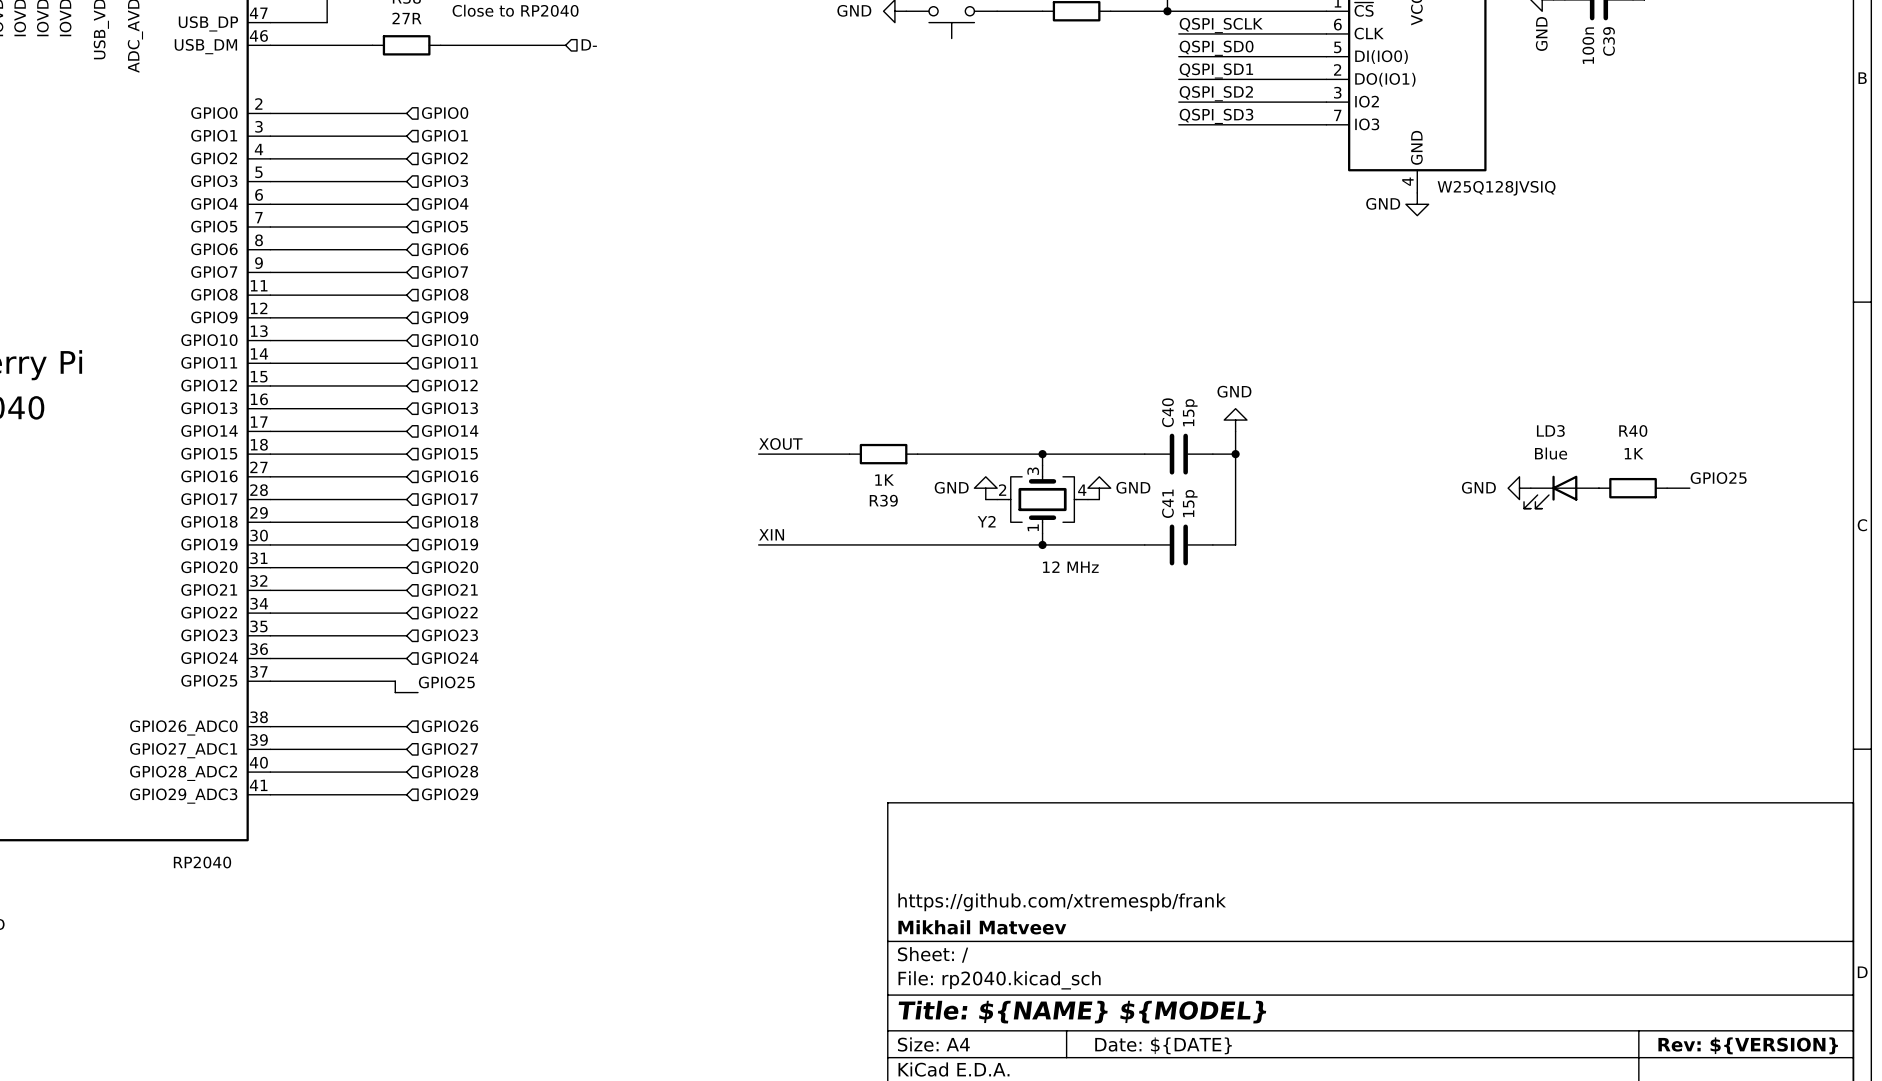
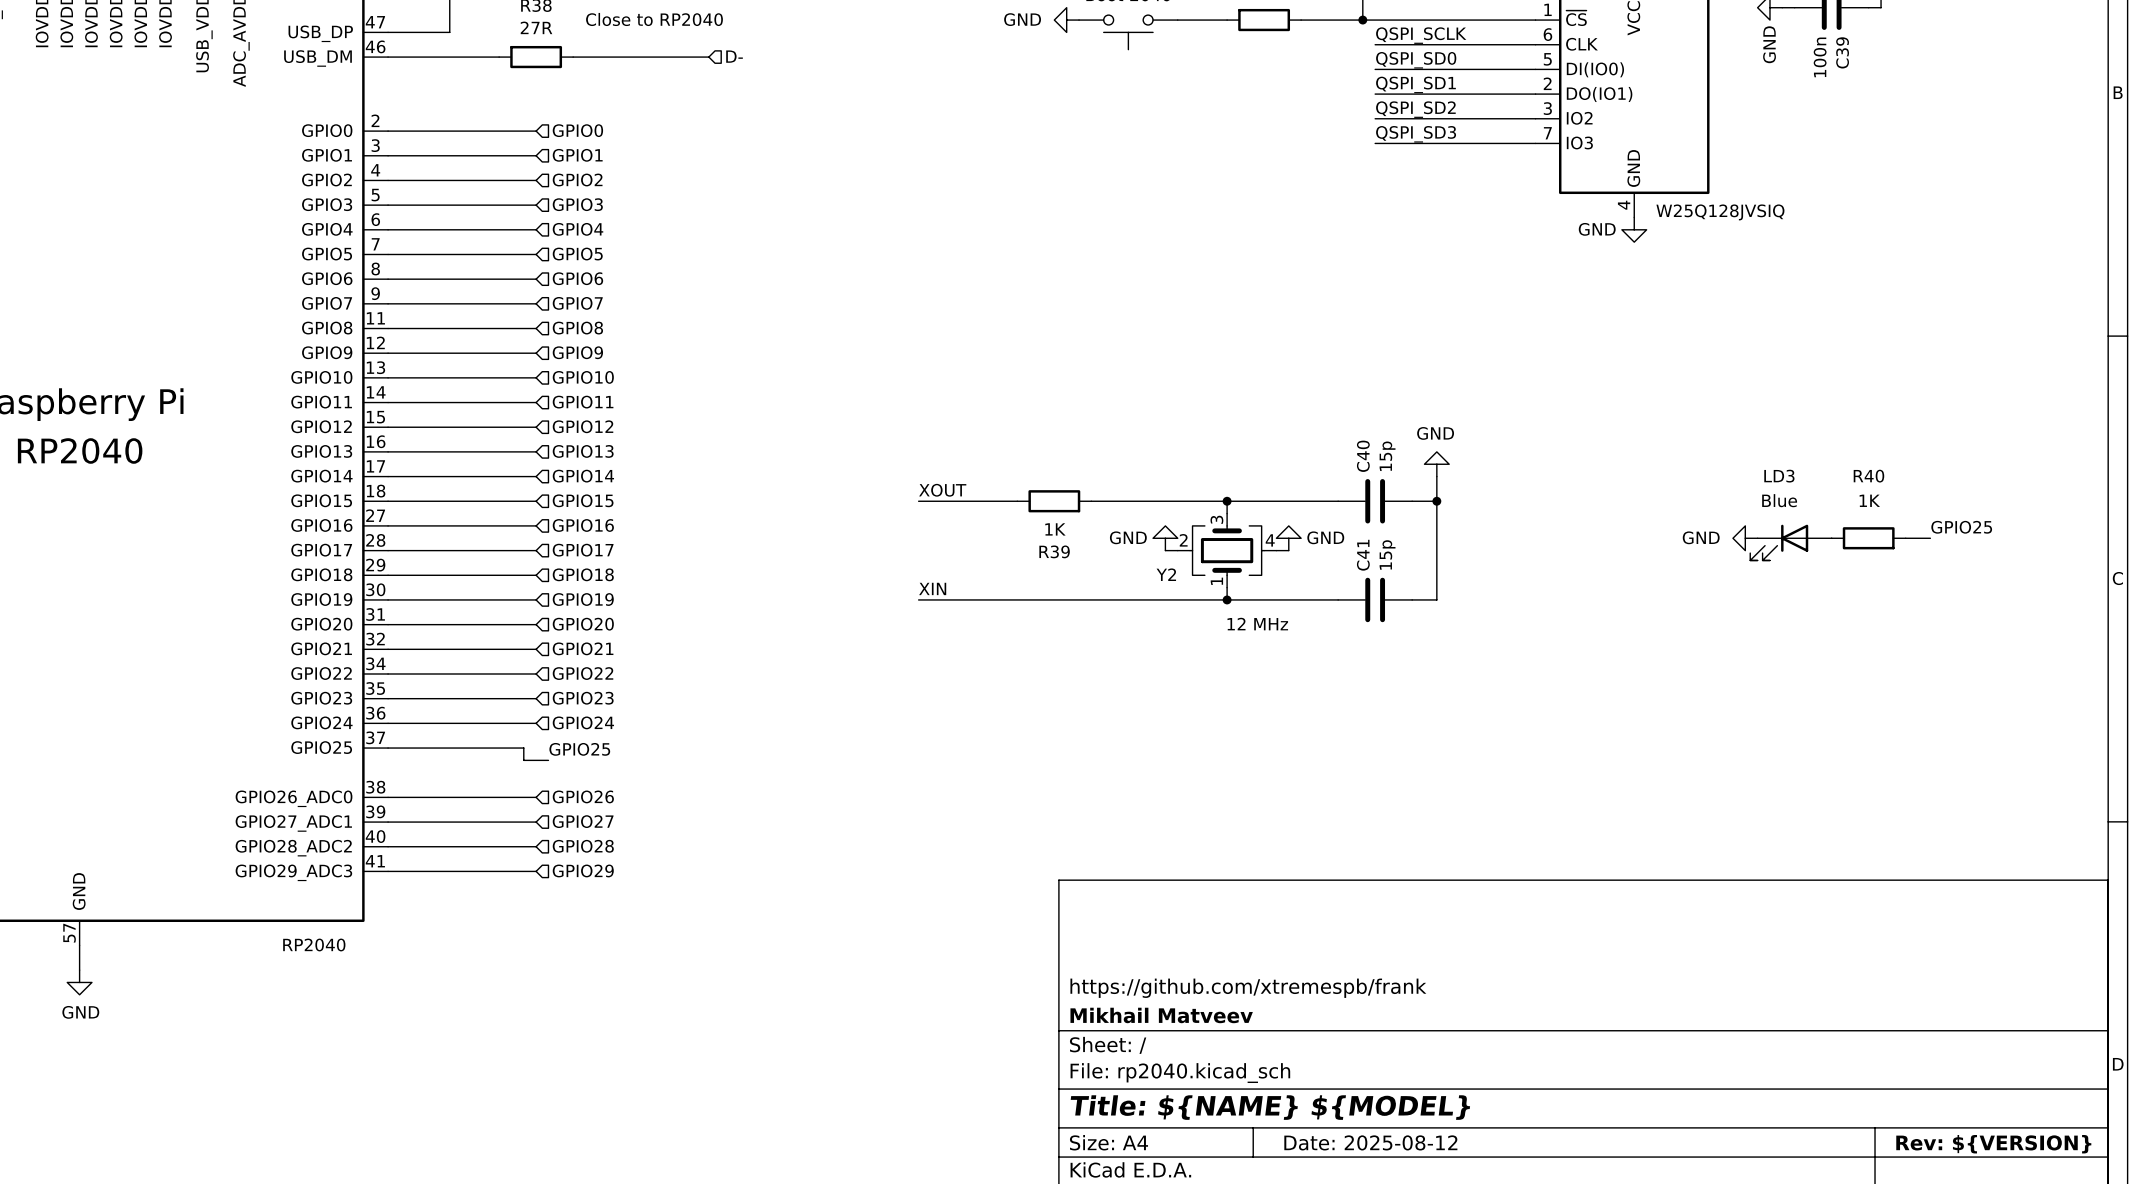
title block: Date: ${DATE} (1163, 1045) -> Date: 2025-08-12 (1370, 1142)

